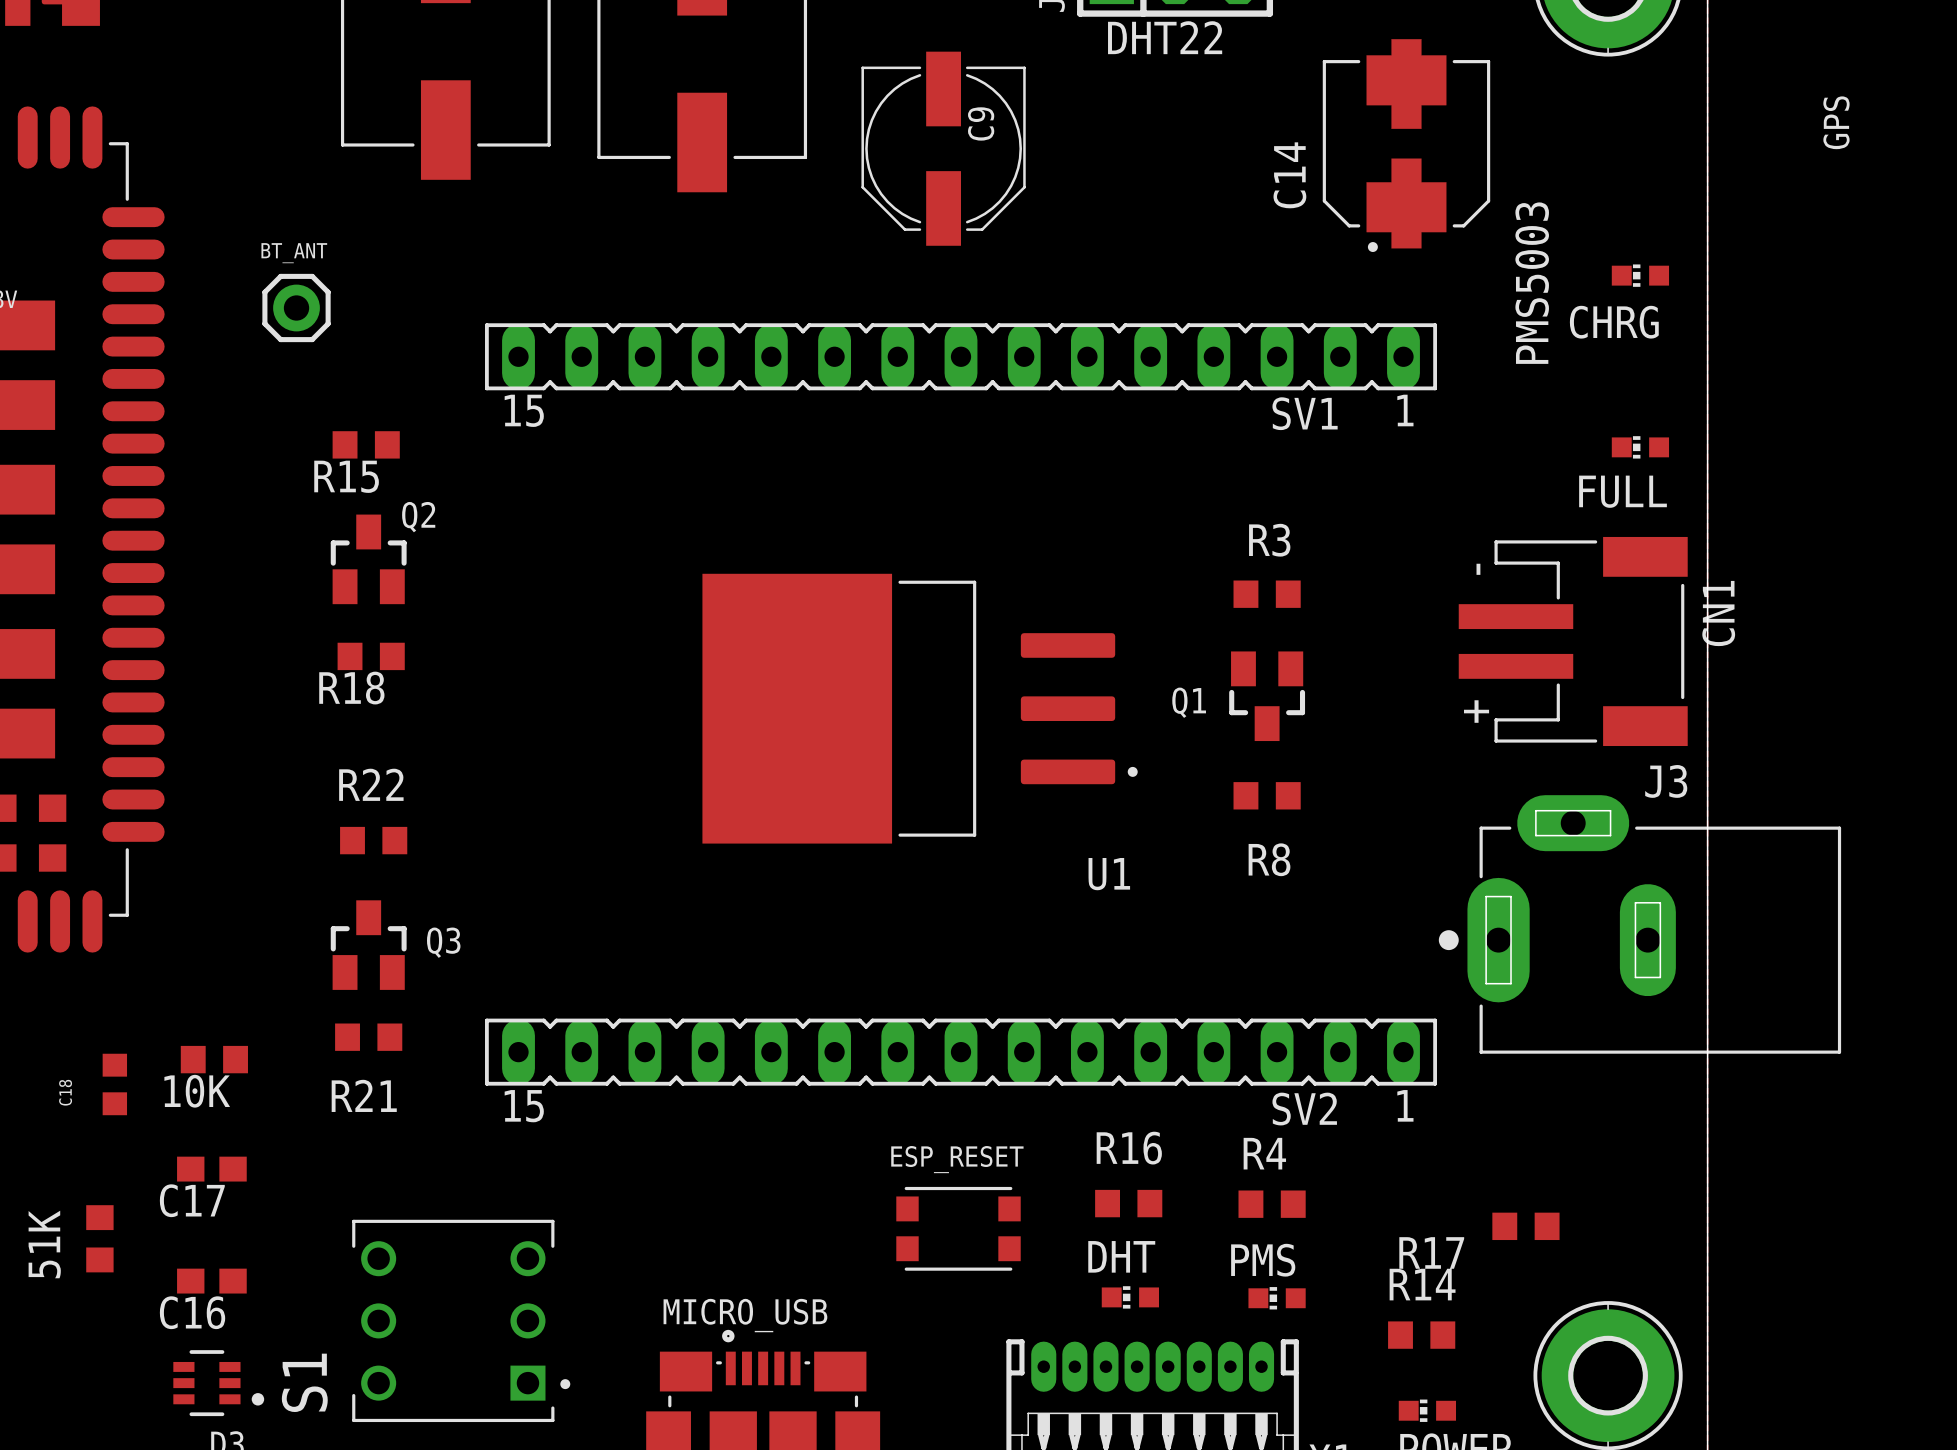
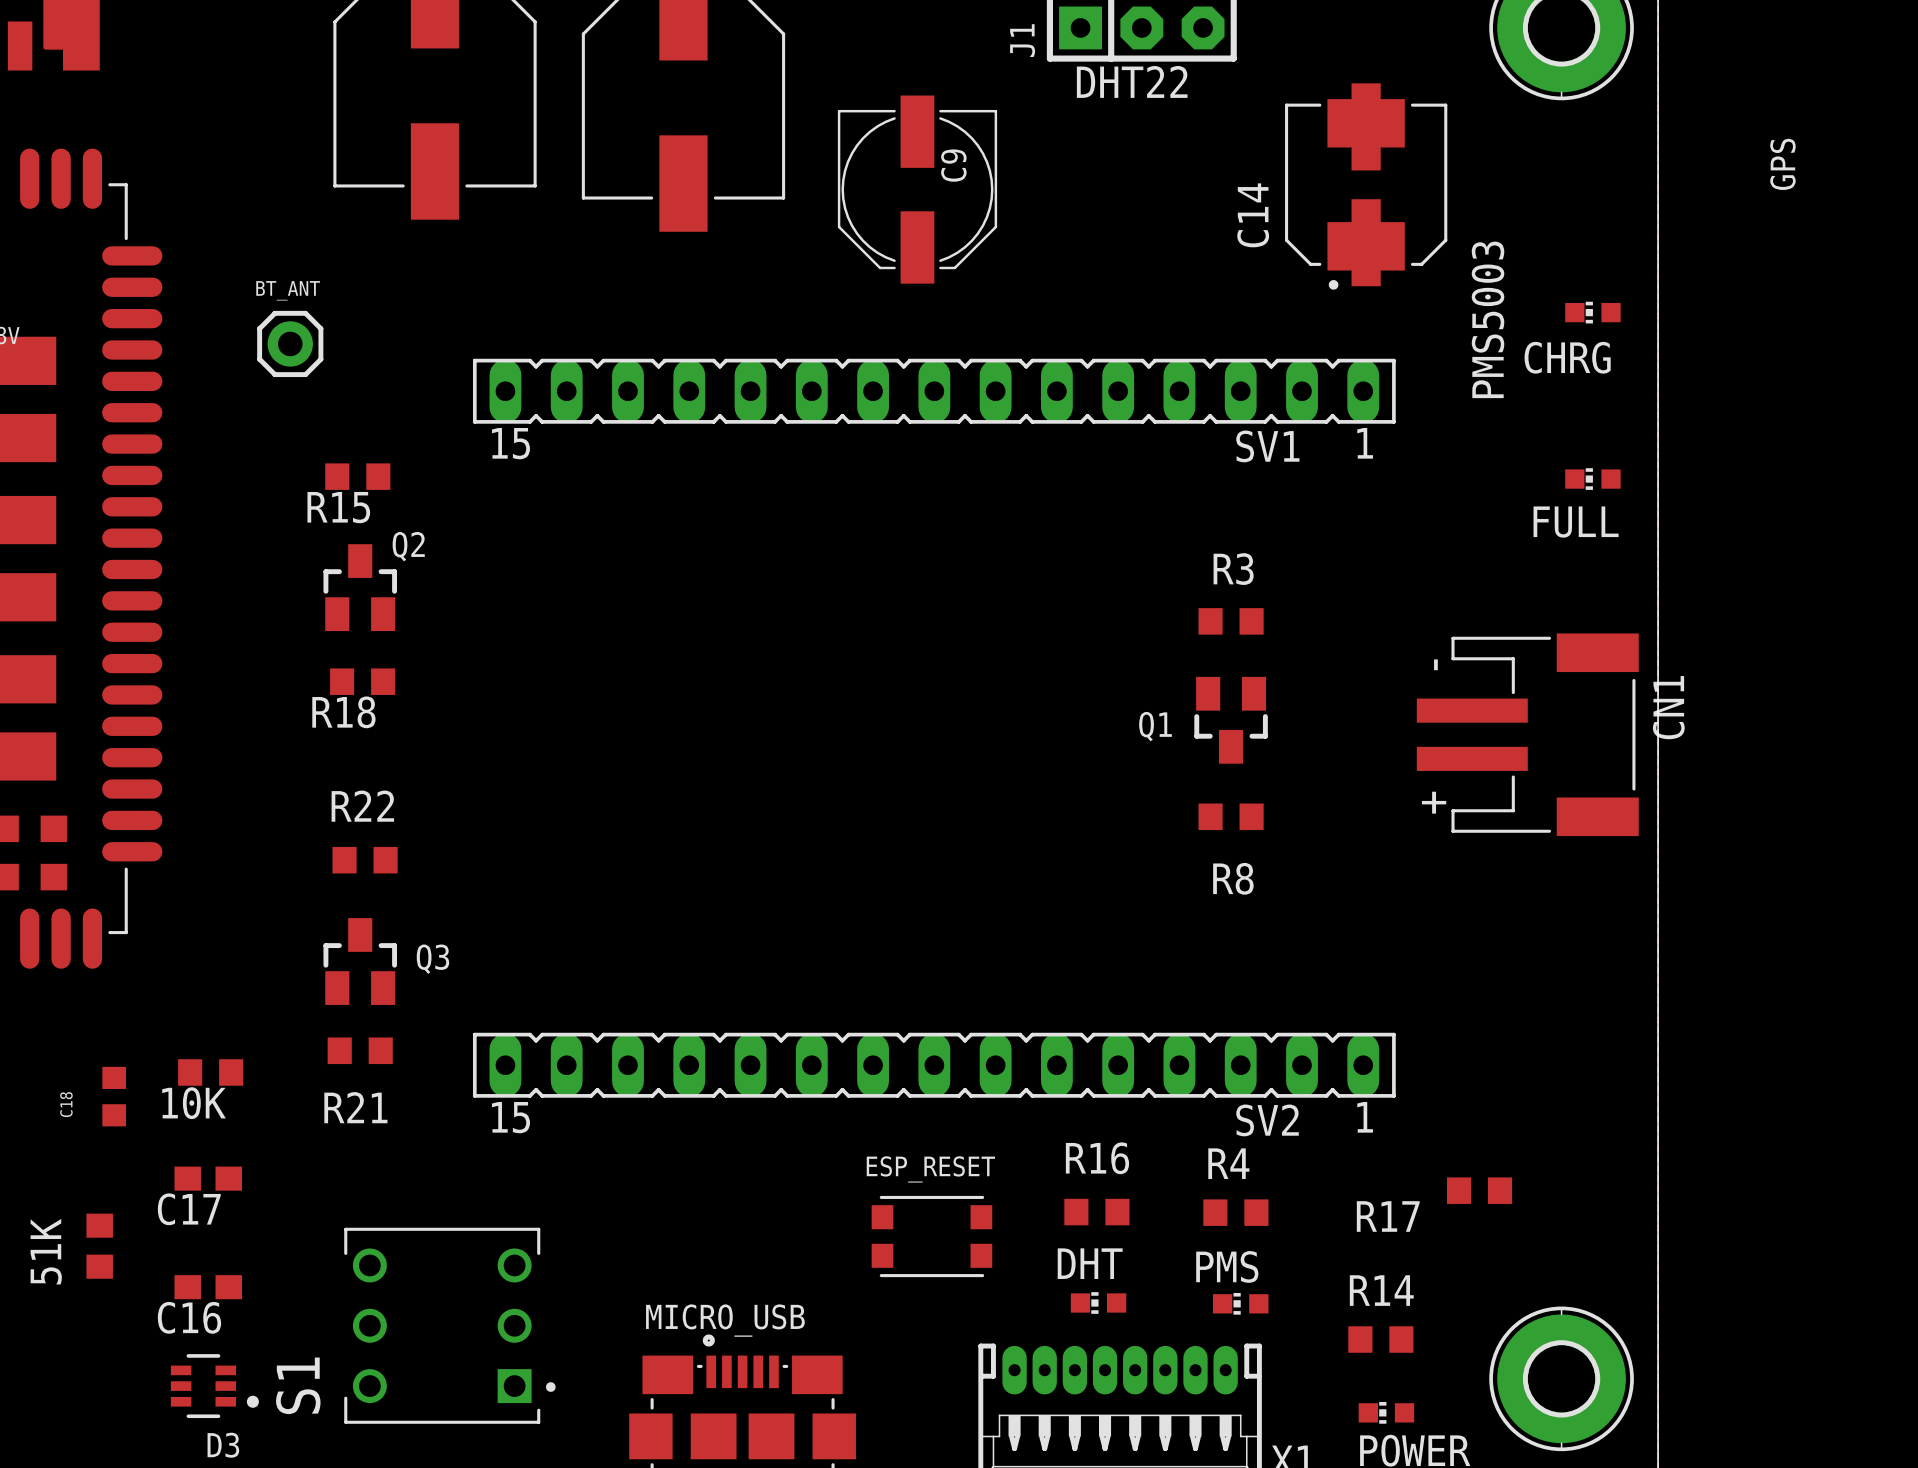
CN1 position: (1573, 641) -> (1527, 734)
U1: (920, 708) -> none
J3: (1639, 924) -> none
R17 position: (1525, 1226) -> (1479, 1190)

